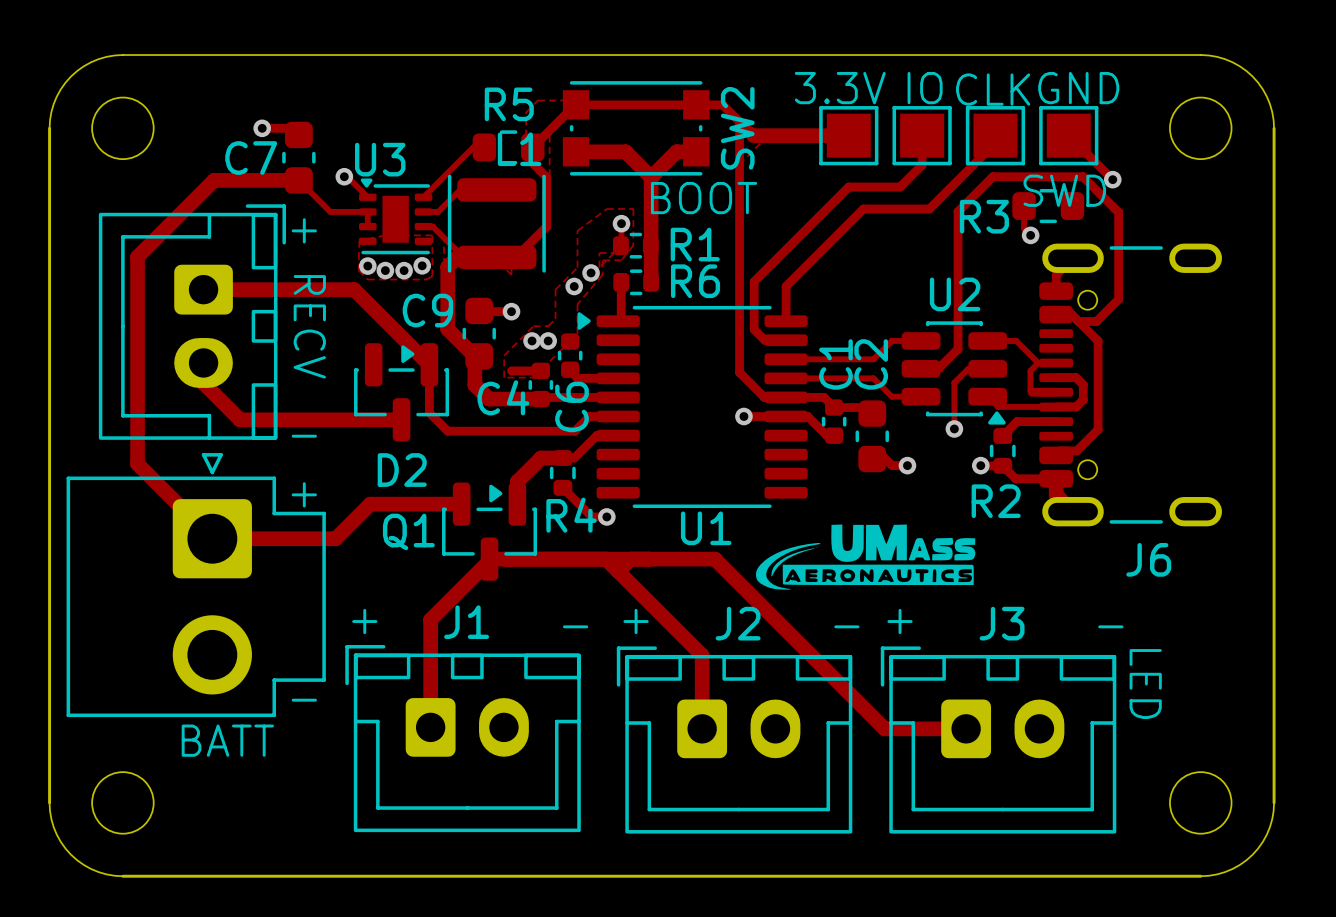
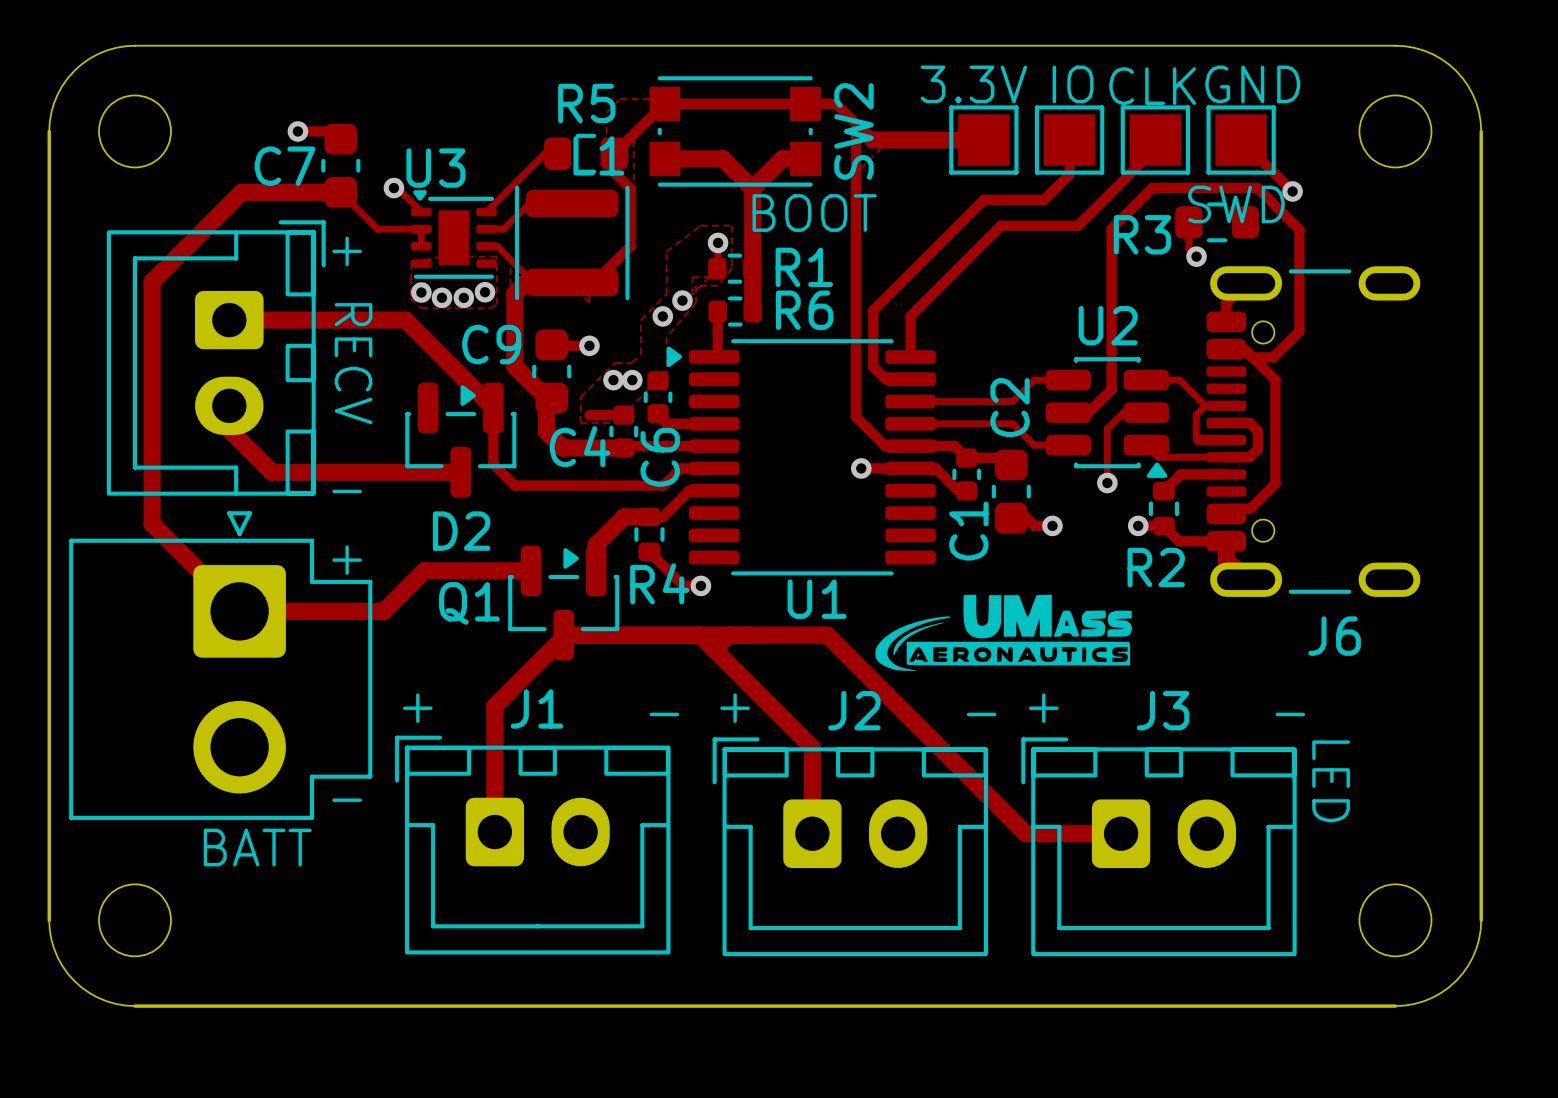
C1 name position: C1 (835, 364) -> C1 (968, 531)

